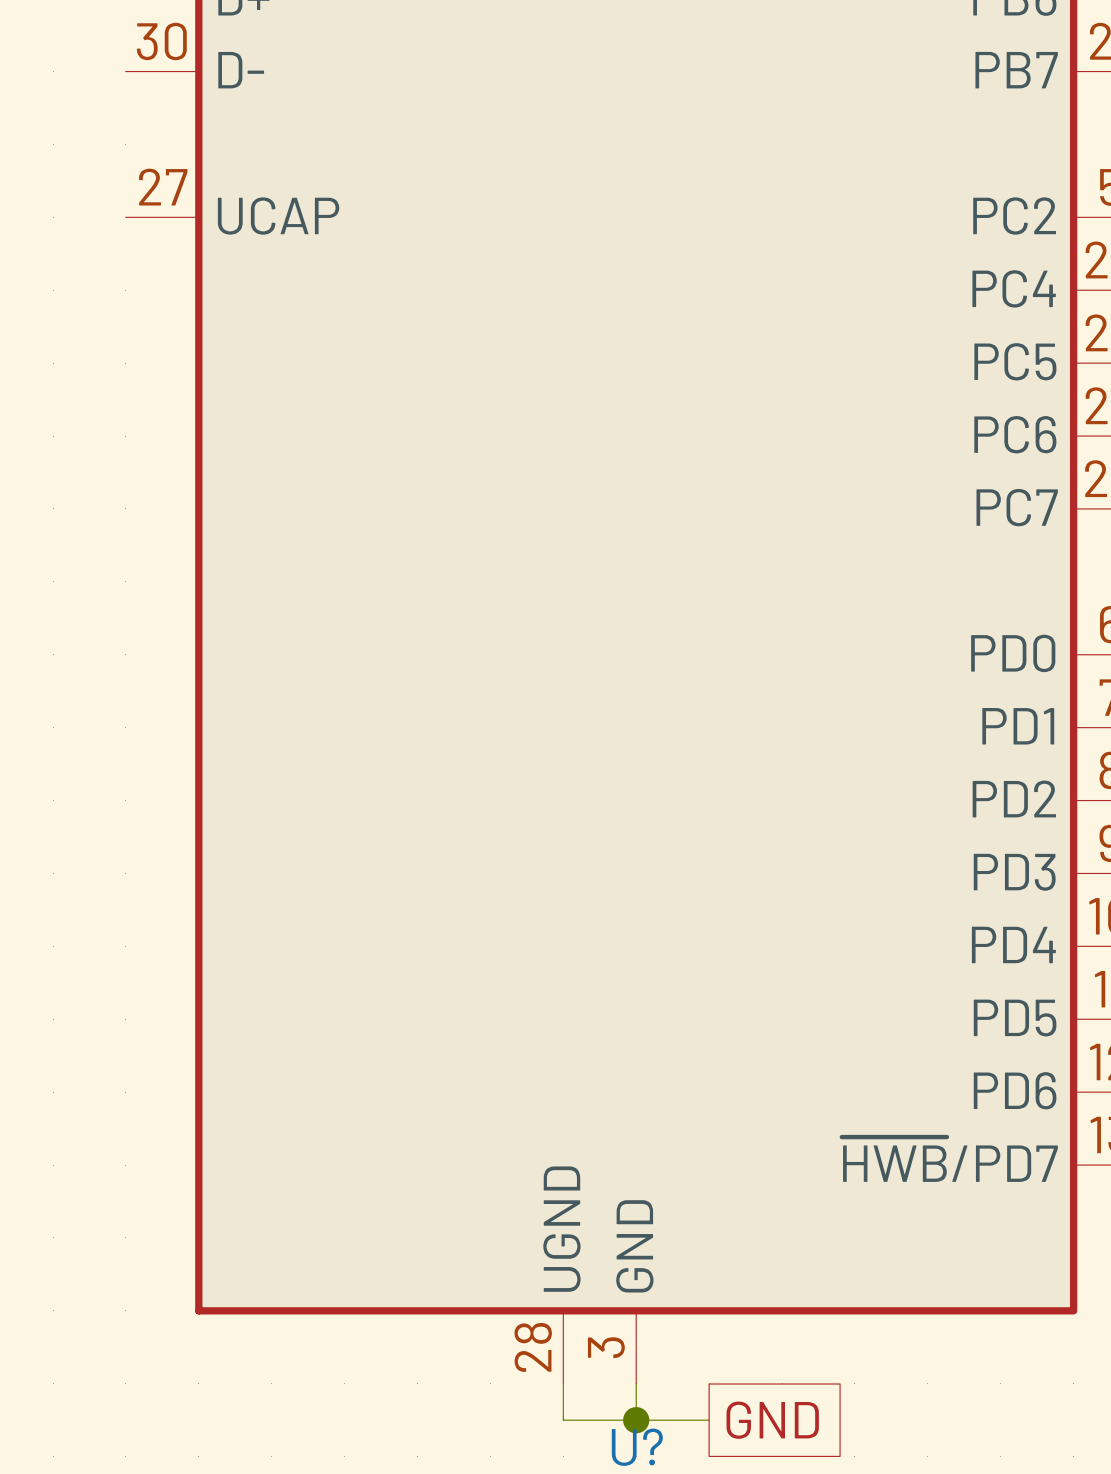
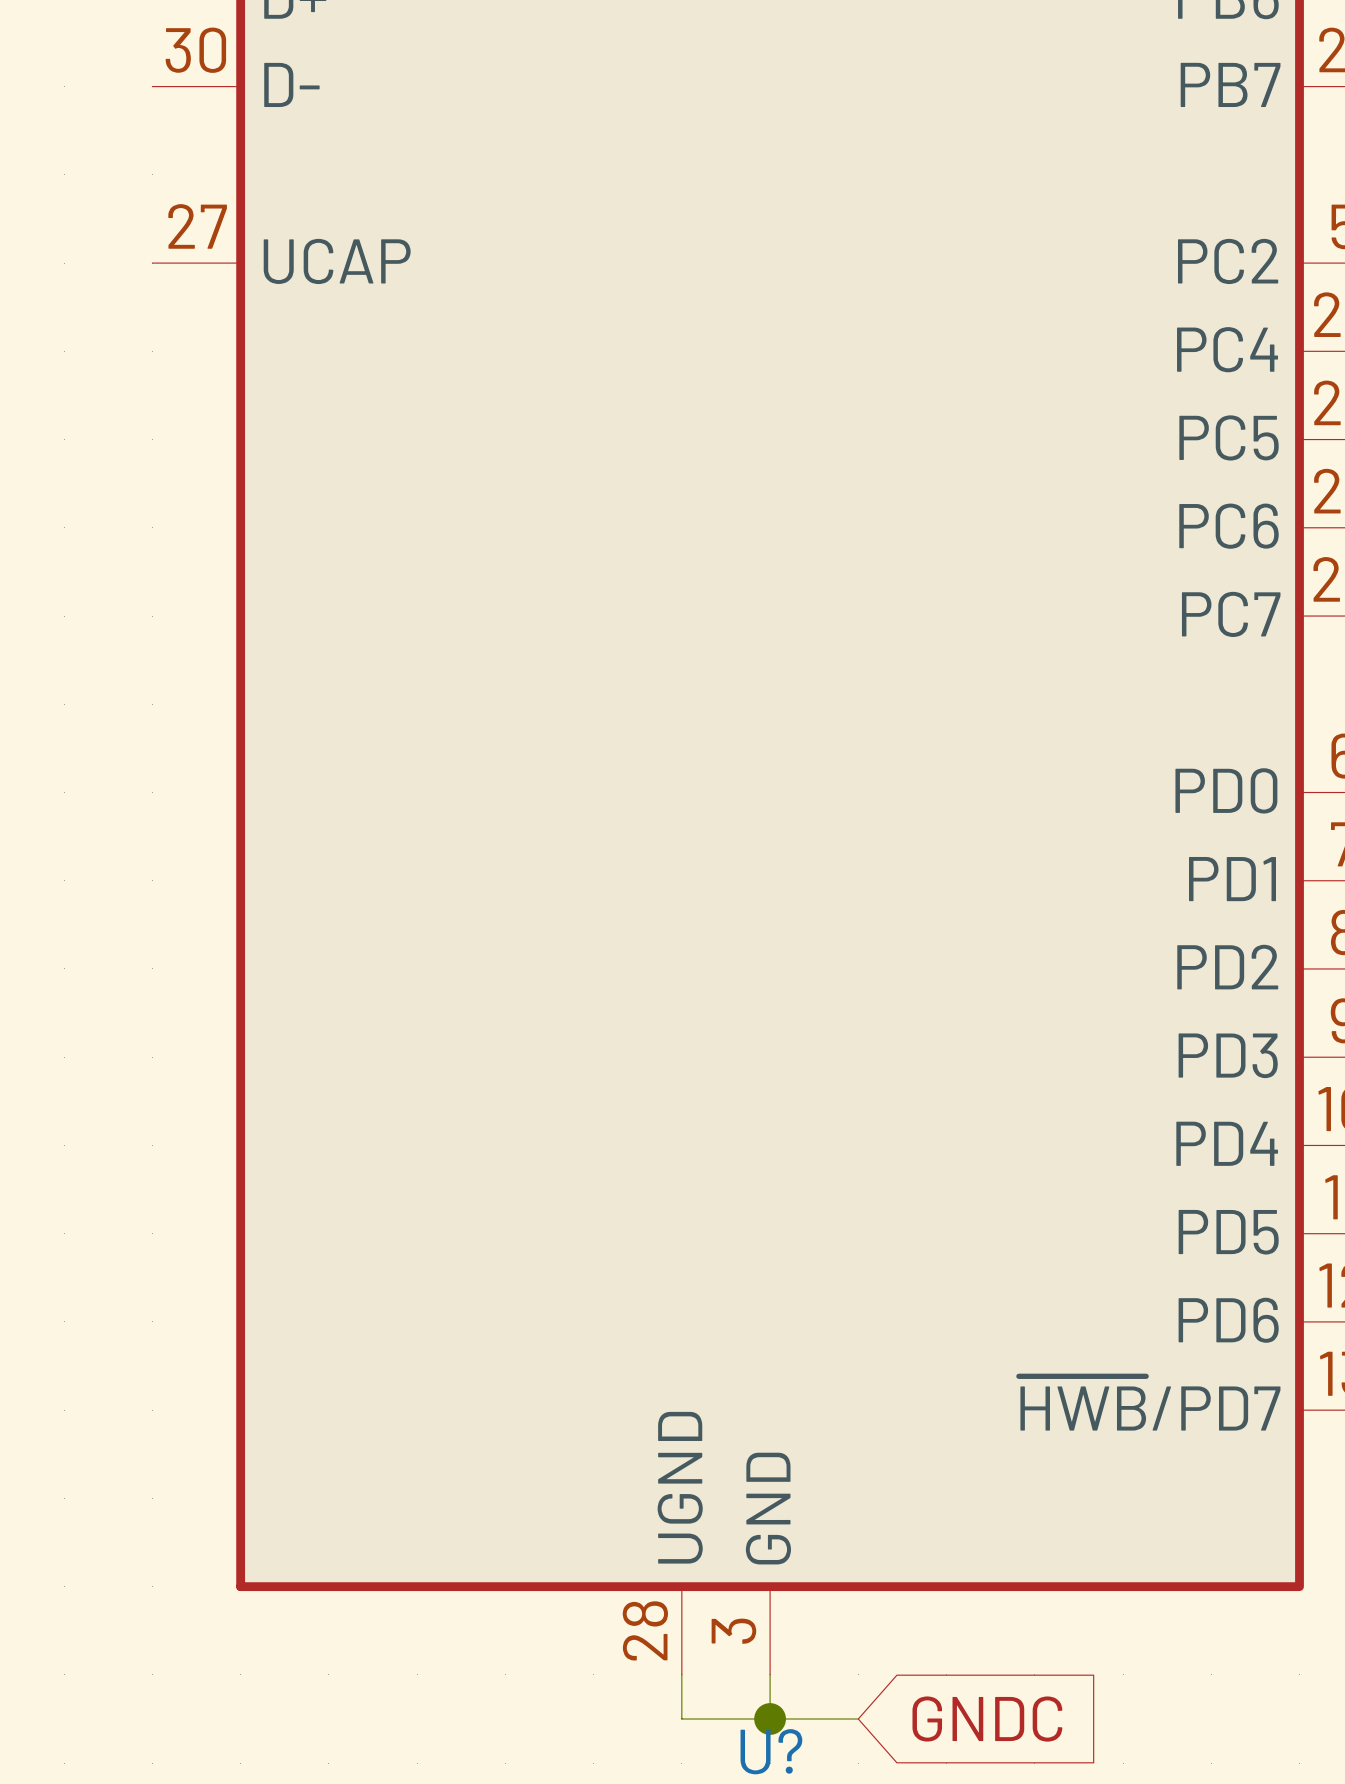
global label shape: passive (772, 1420) -> input (987, 1719)
global label: GND (772, 1420) -> GNDC (987, 1719)

